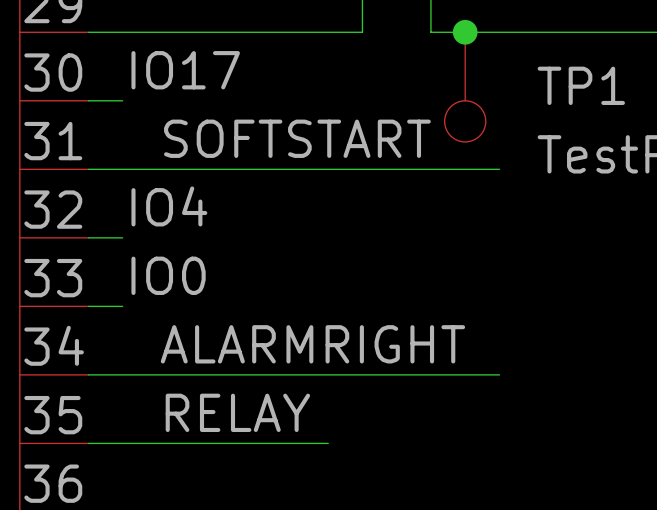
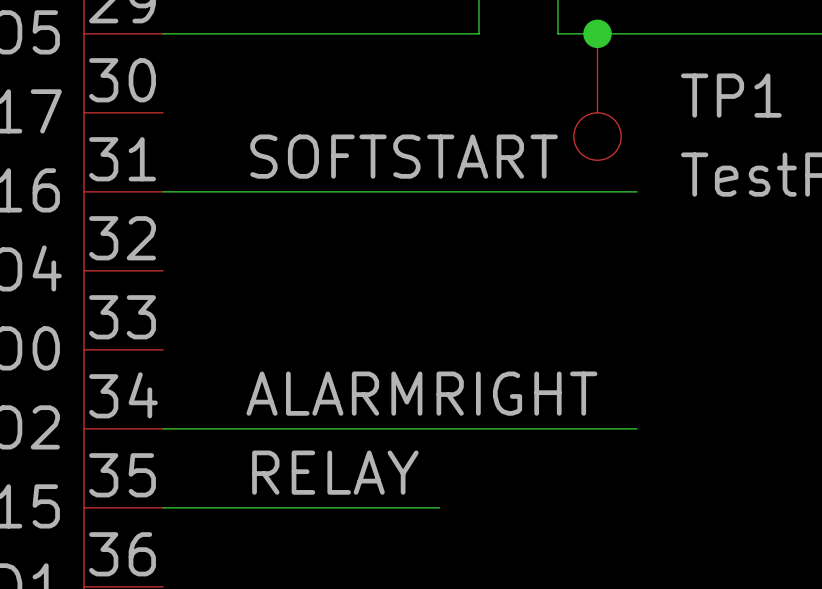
label: IO17 (185, 70) -> none
wire: (88, 100) (122, 100) -> none
label: IO4 (169, 206) -> none
wire: (88, 237) (122, 237) -> none
label: IO0 (168, 275) -> none
wire: (88, 306) (122, 306) -> none

